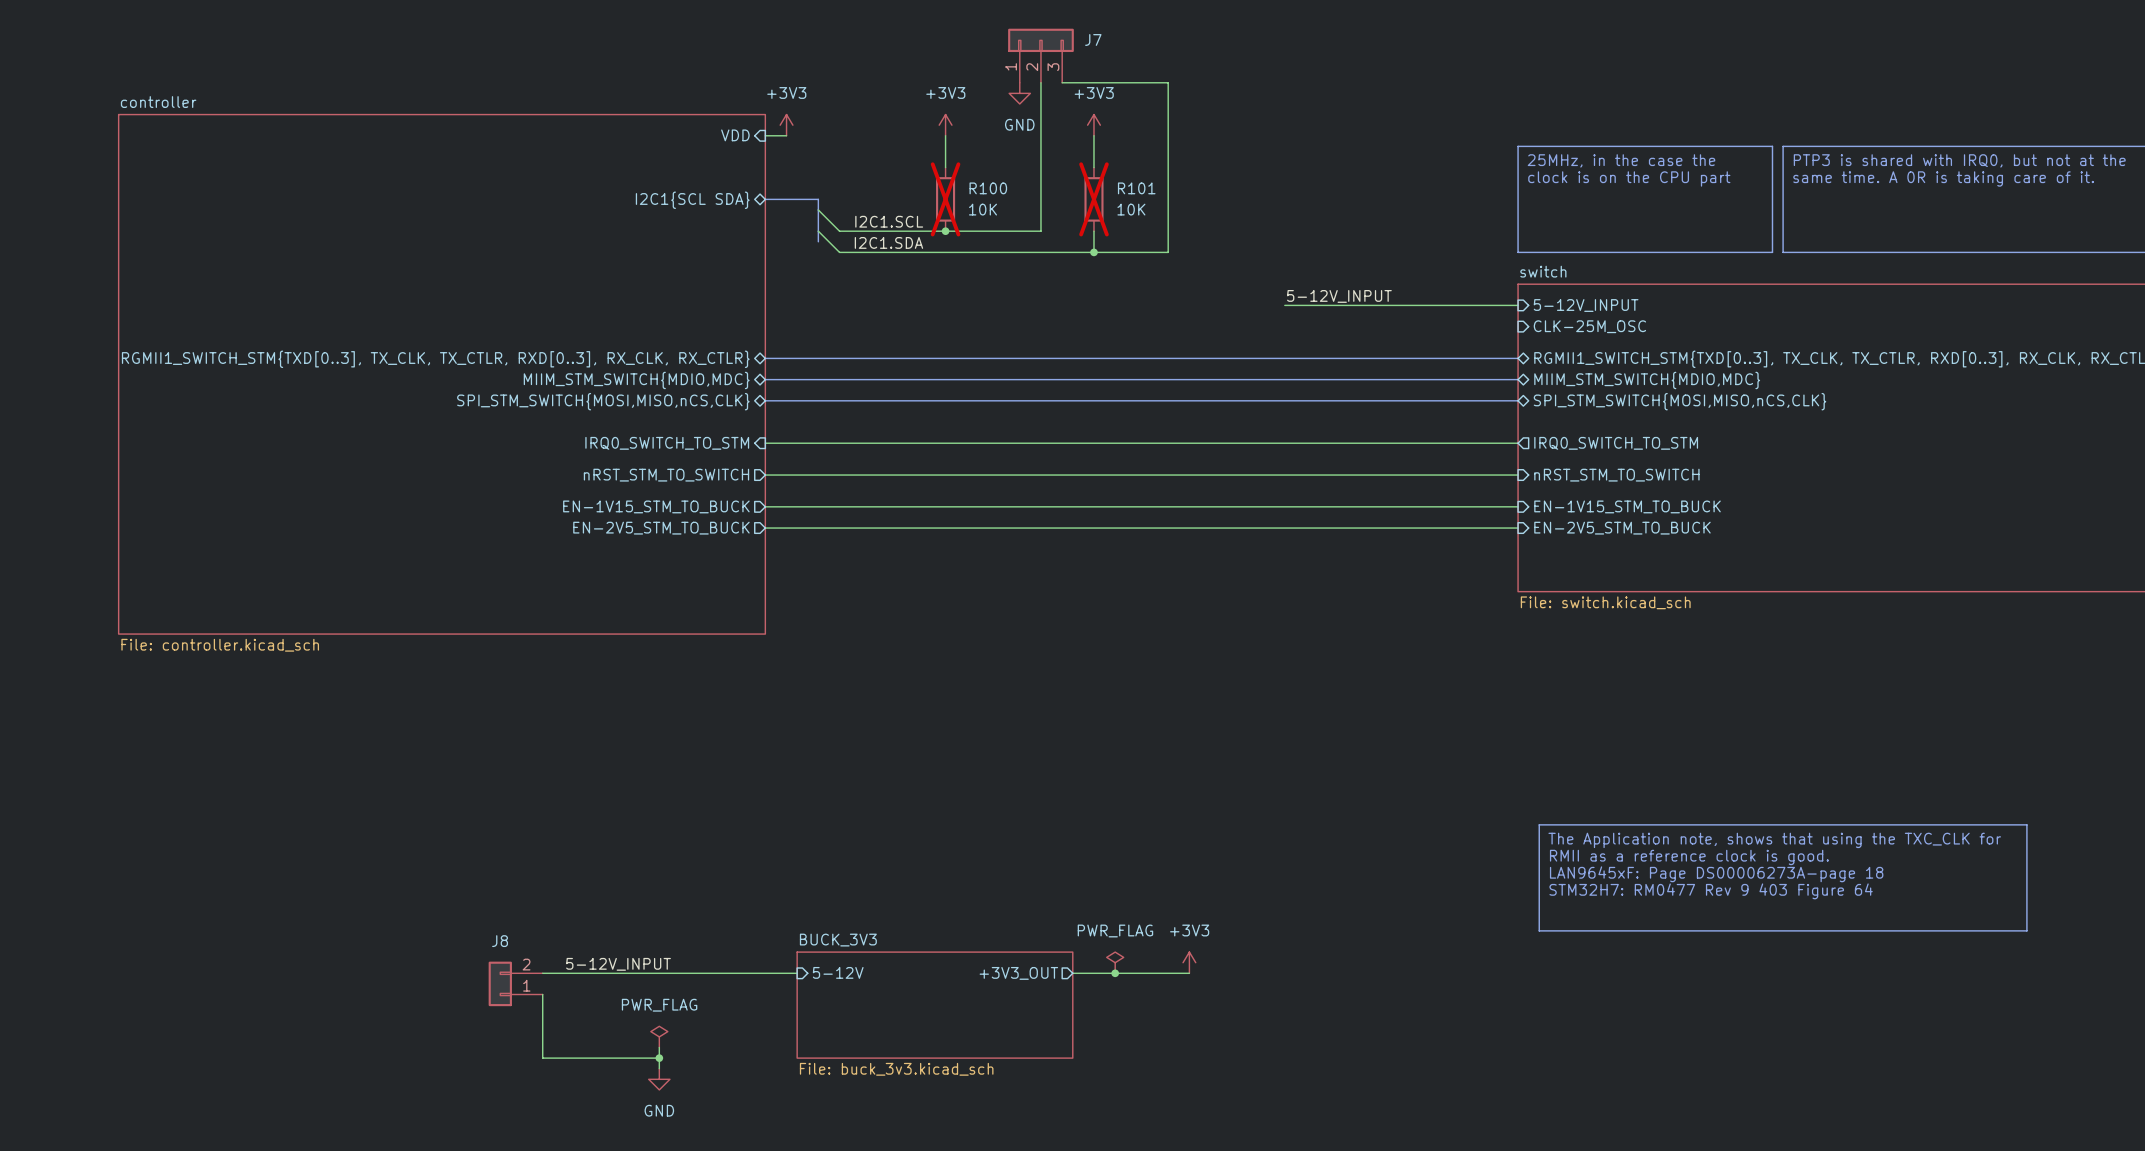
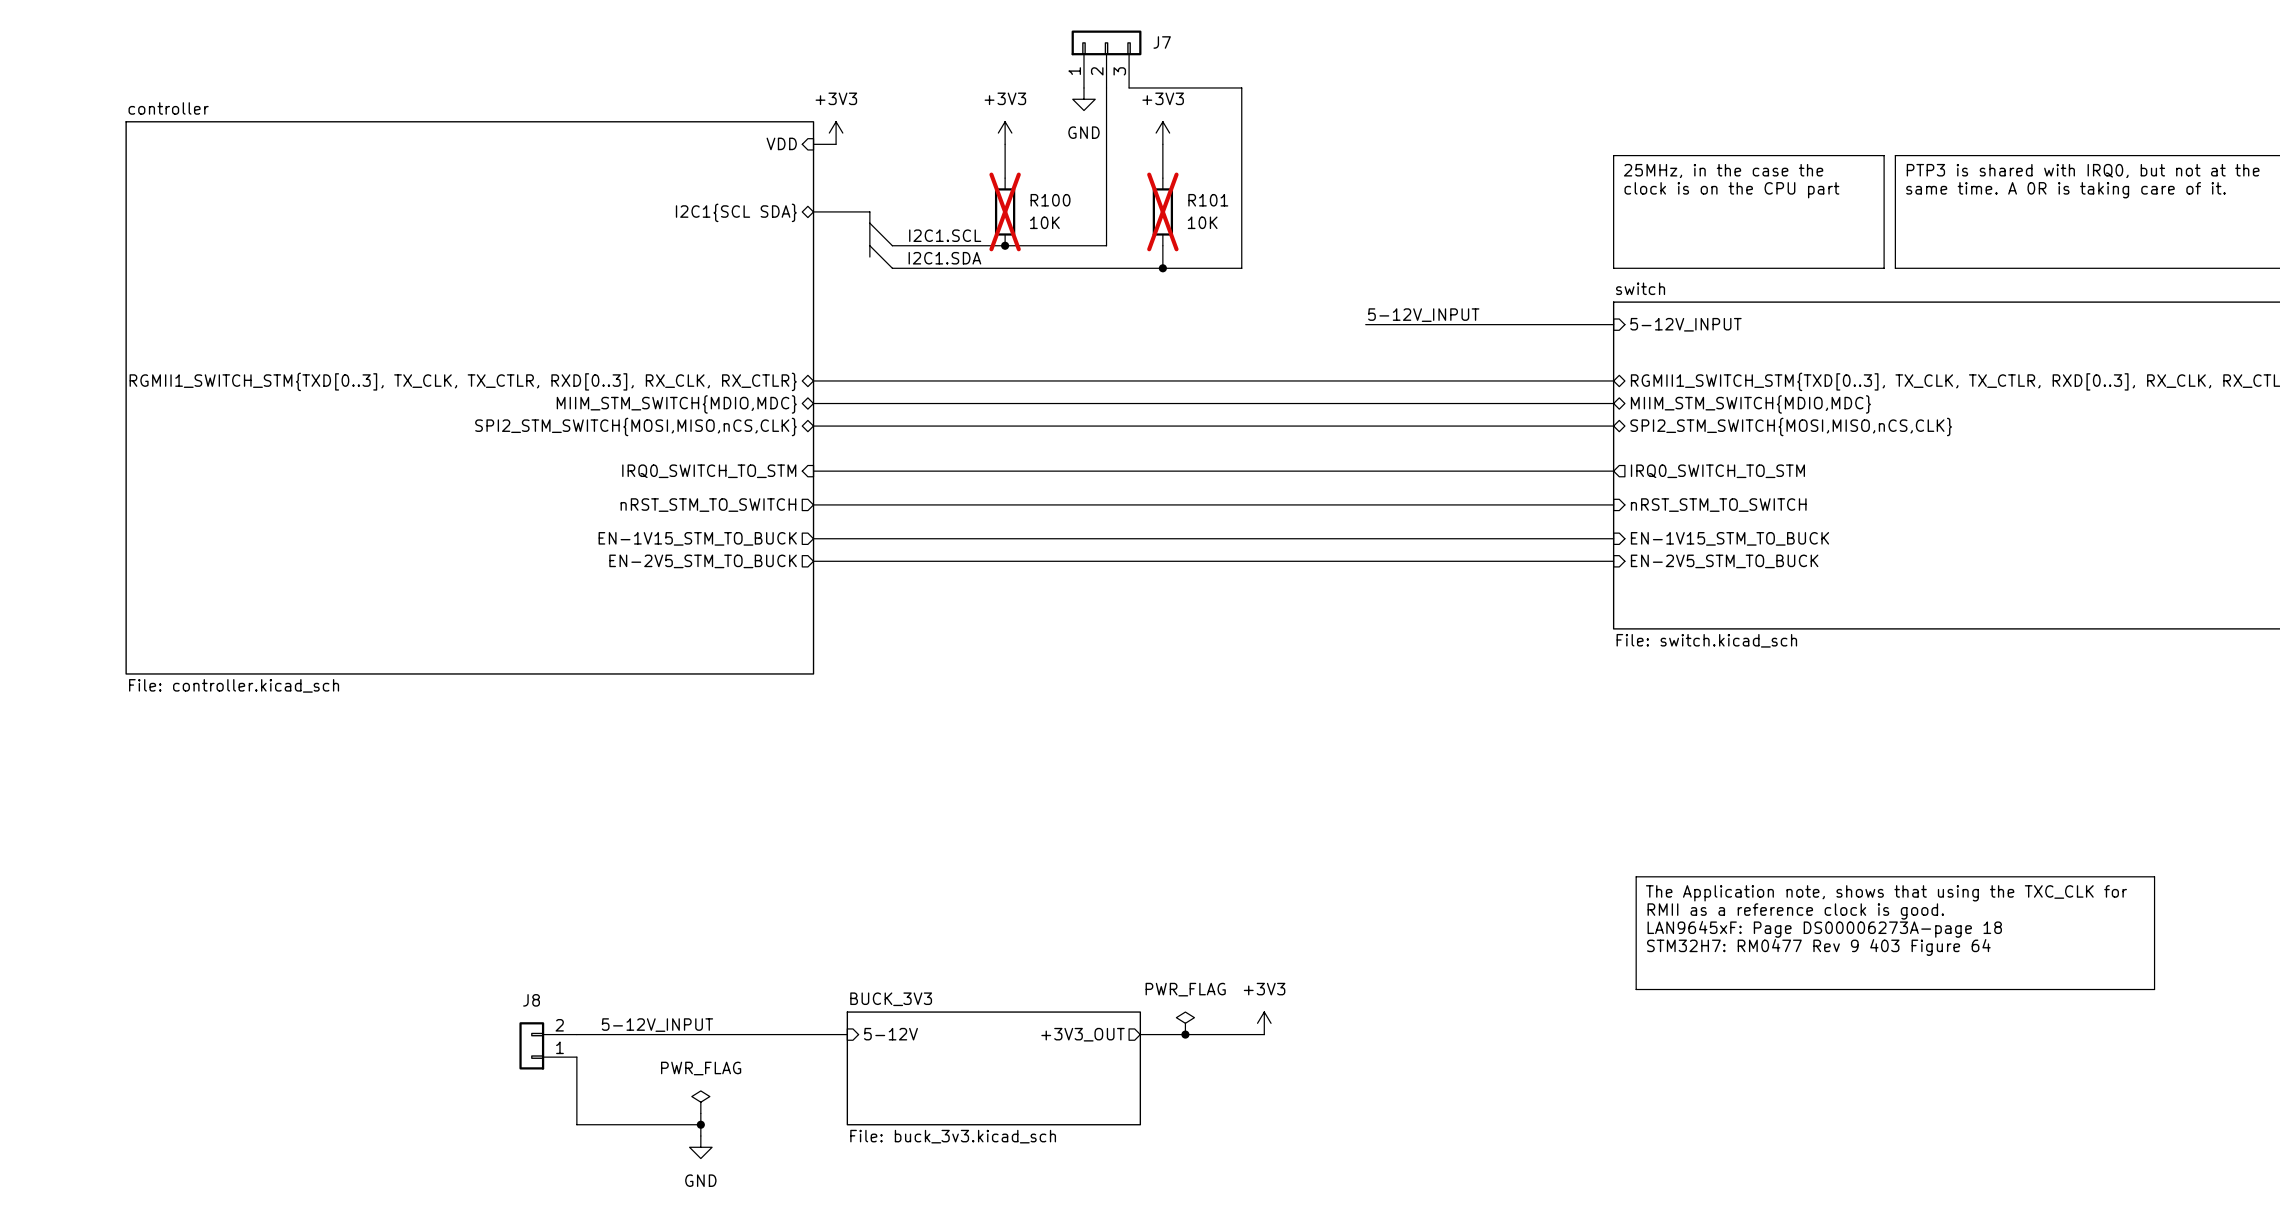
sheet pin: CLK-25M_OSC (1589, 326) -> none
sheet pin: SPI_STM_SWITCH{MOSI,MISO,nCS,CLK} (603, 401) -> SPI2_STM_SWITCH{MOSI,MISO,nCS,CLK} (636, 426)
sheet pin: SPI_STM_SWITCH{MOSI,MISO,nCS,CLK} (1680, 401) -> SPI2_STM_SWITCH{MOSI,MISO,nCS,CLK} (1791, 426)

